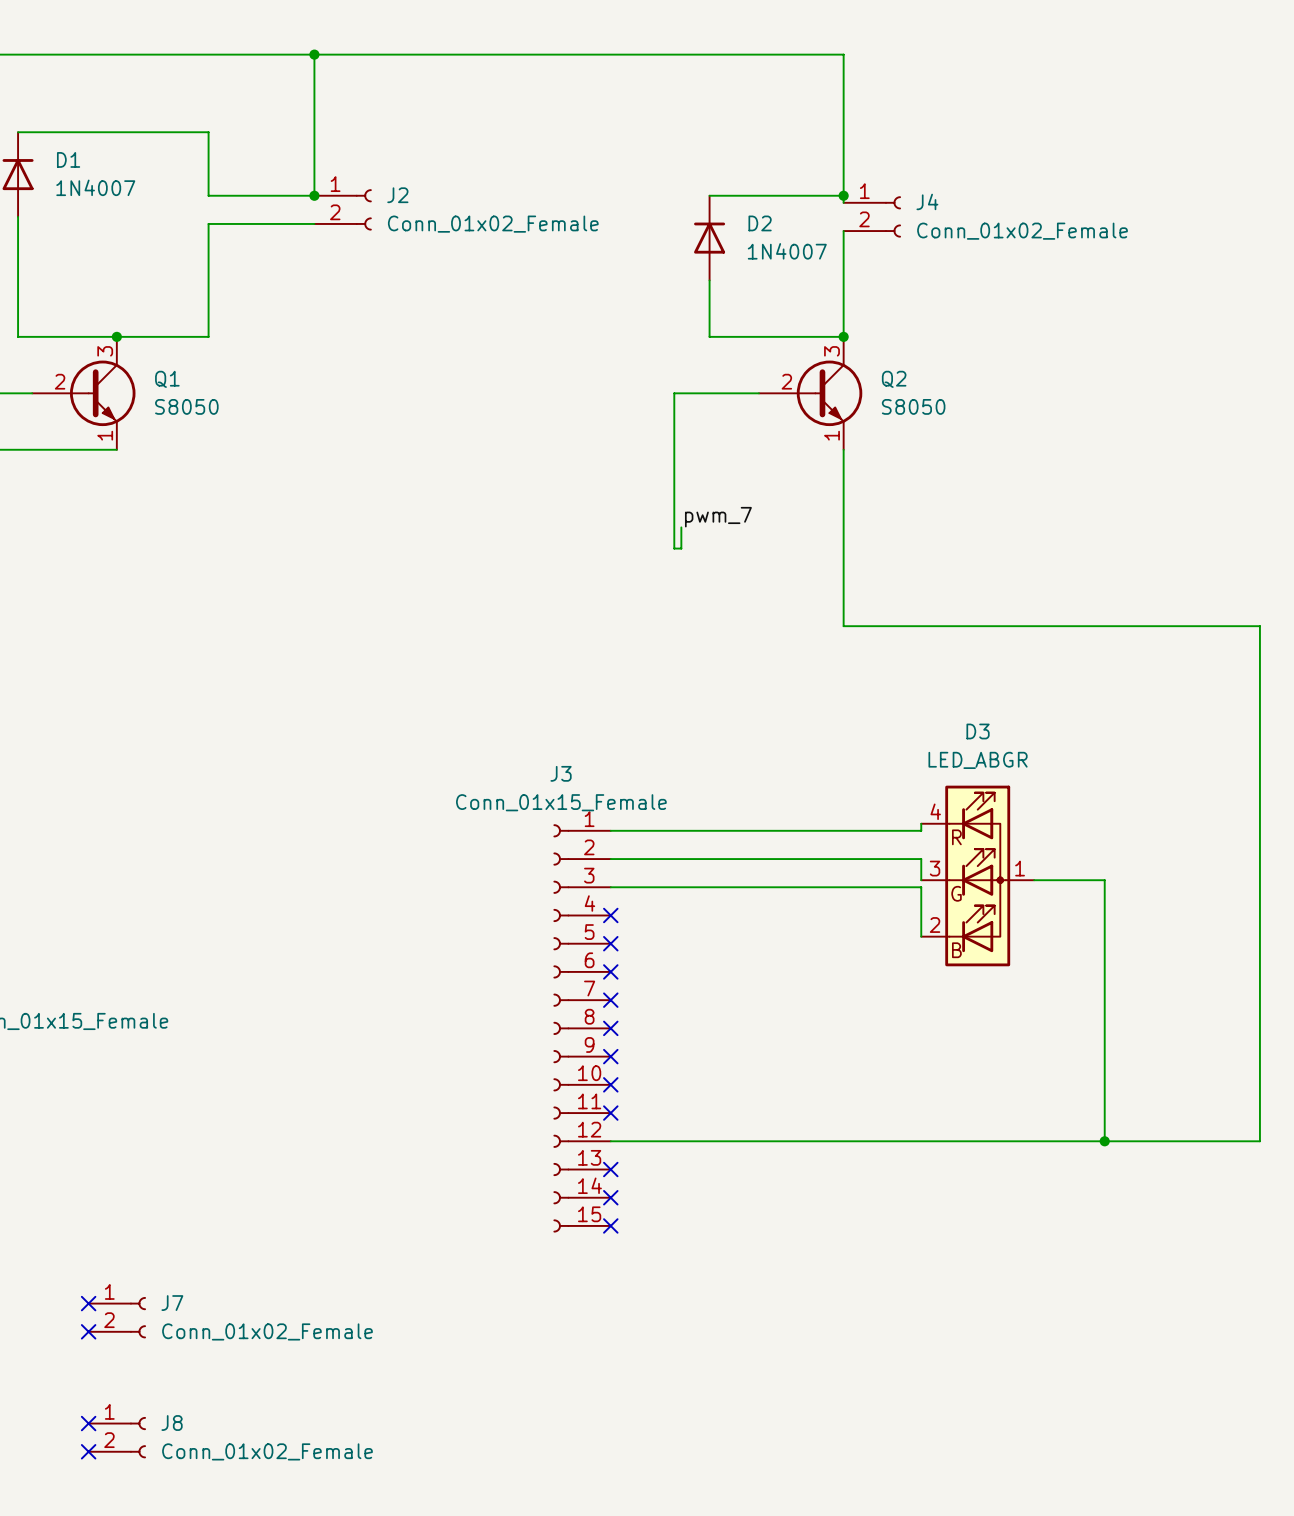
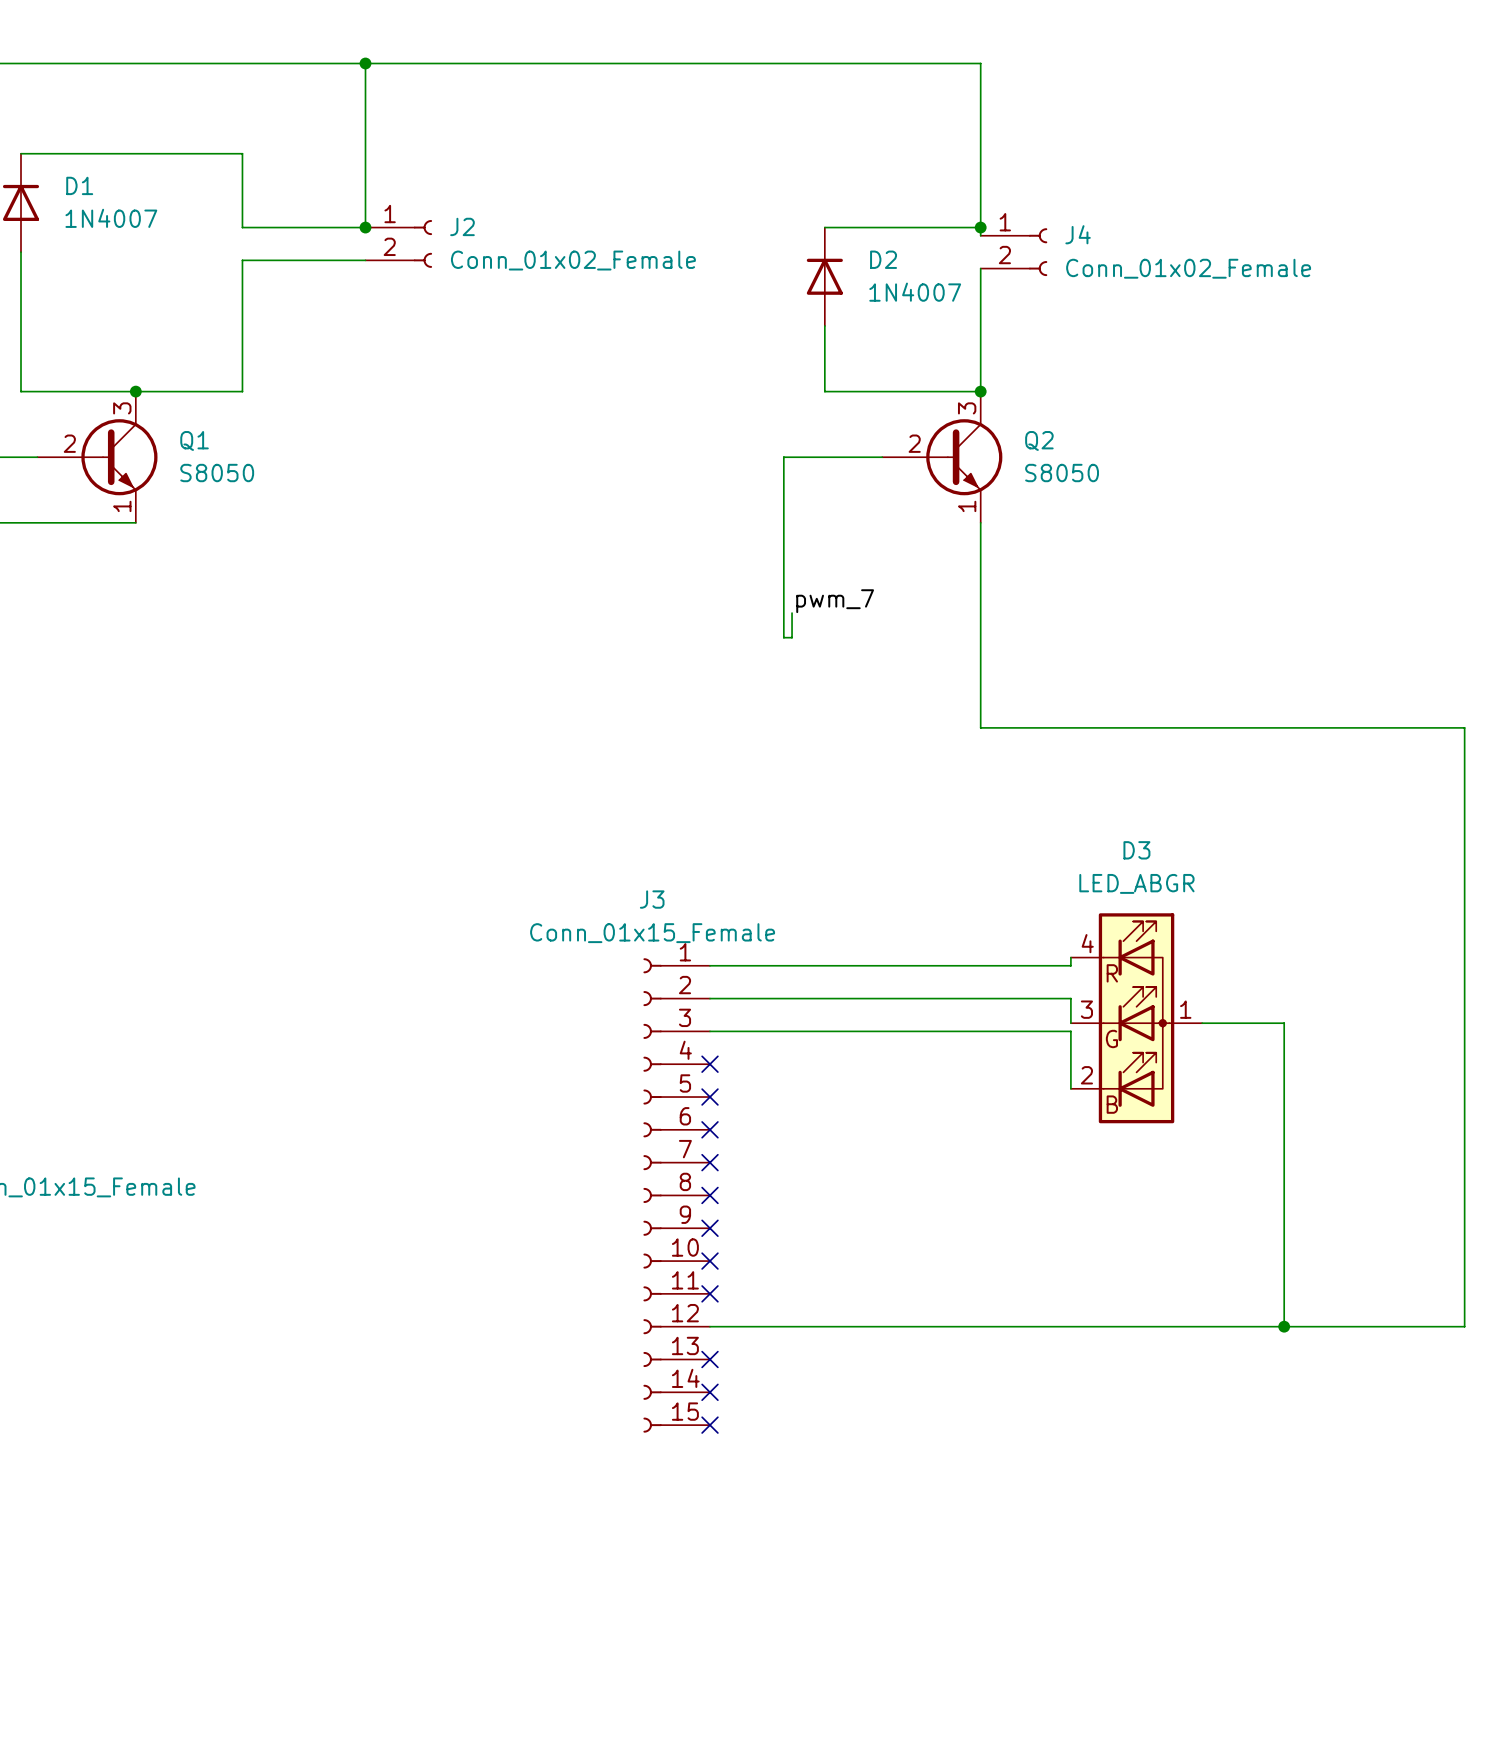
no-connect mark: (88, 1303) -> none
J7: Conn_01x02_Female (117, 1317) -> none
no-connect mark: (88, 1331) -> none
no-connect mark: (88, 1423) -> none
J8: Conn_01x02_Female (117, 1437) -> none
no-connect mark: (88, 1451) -> none

